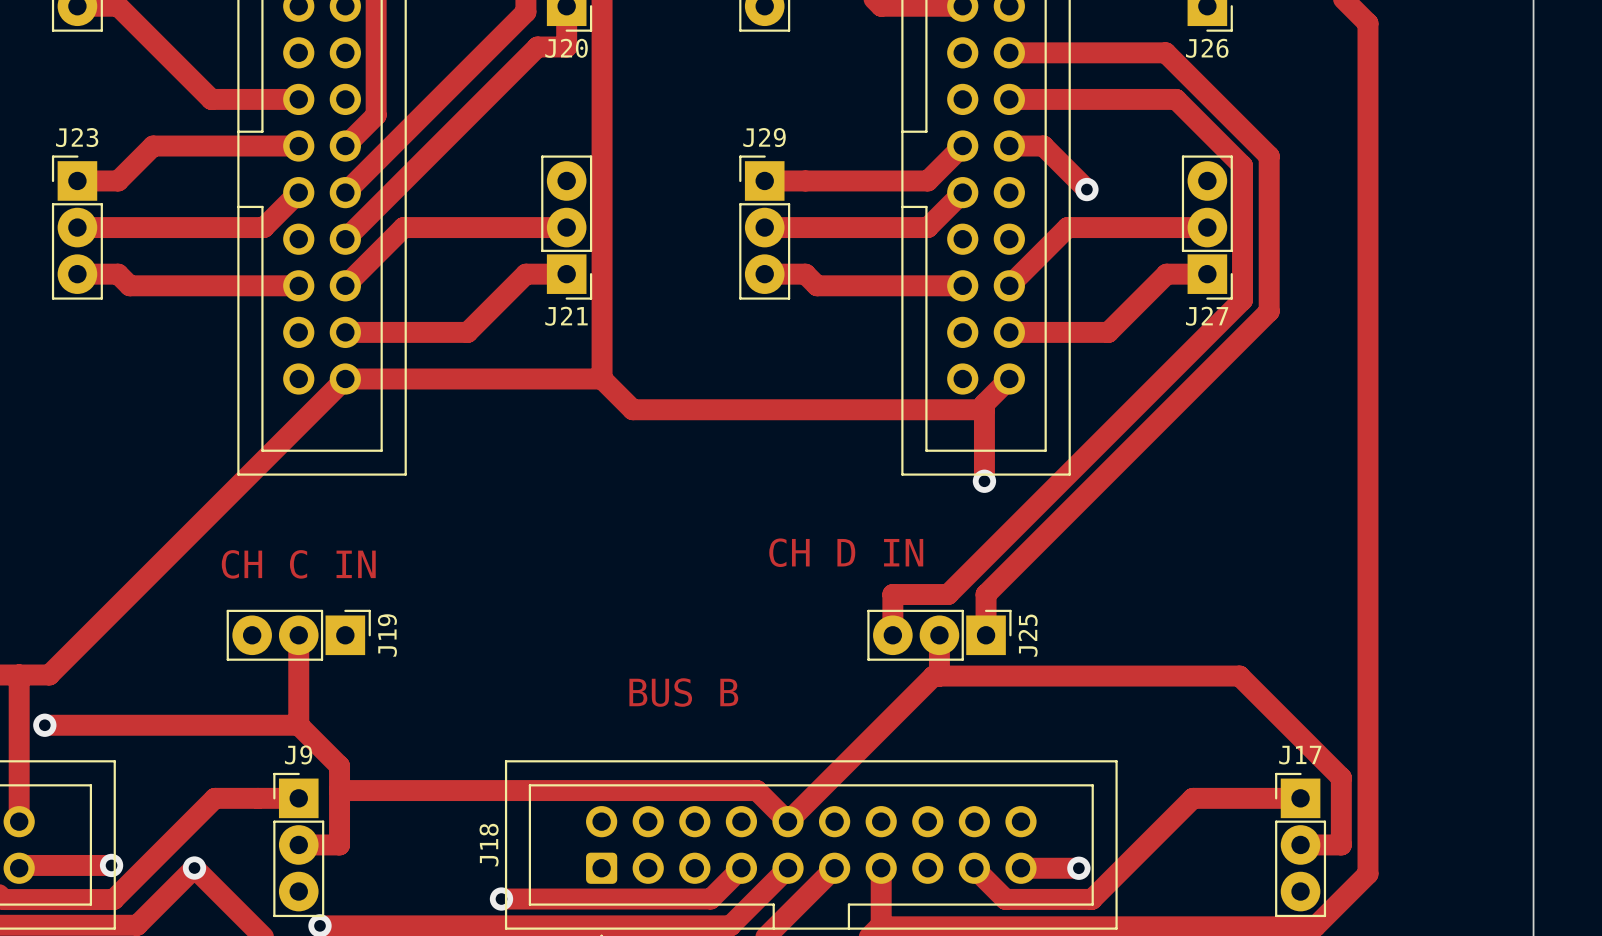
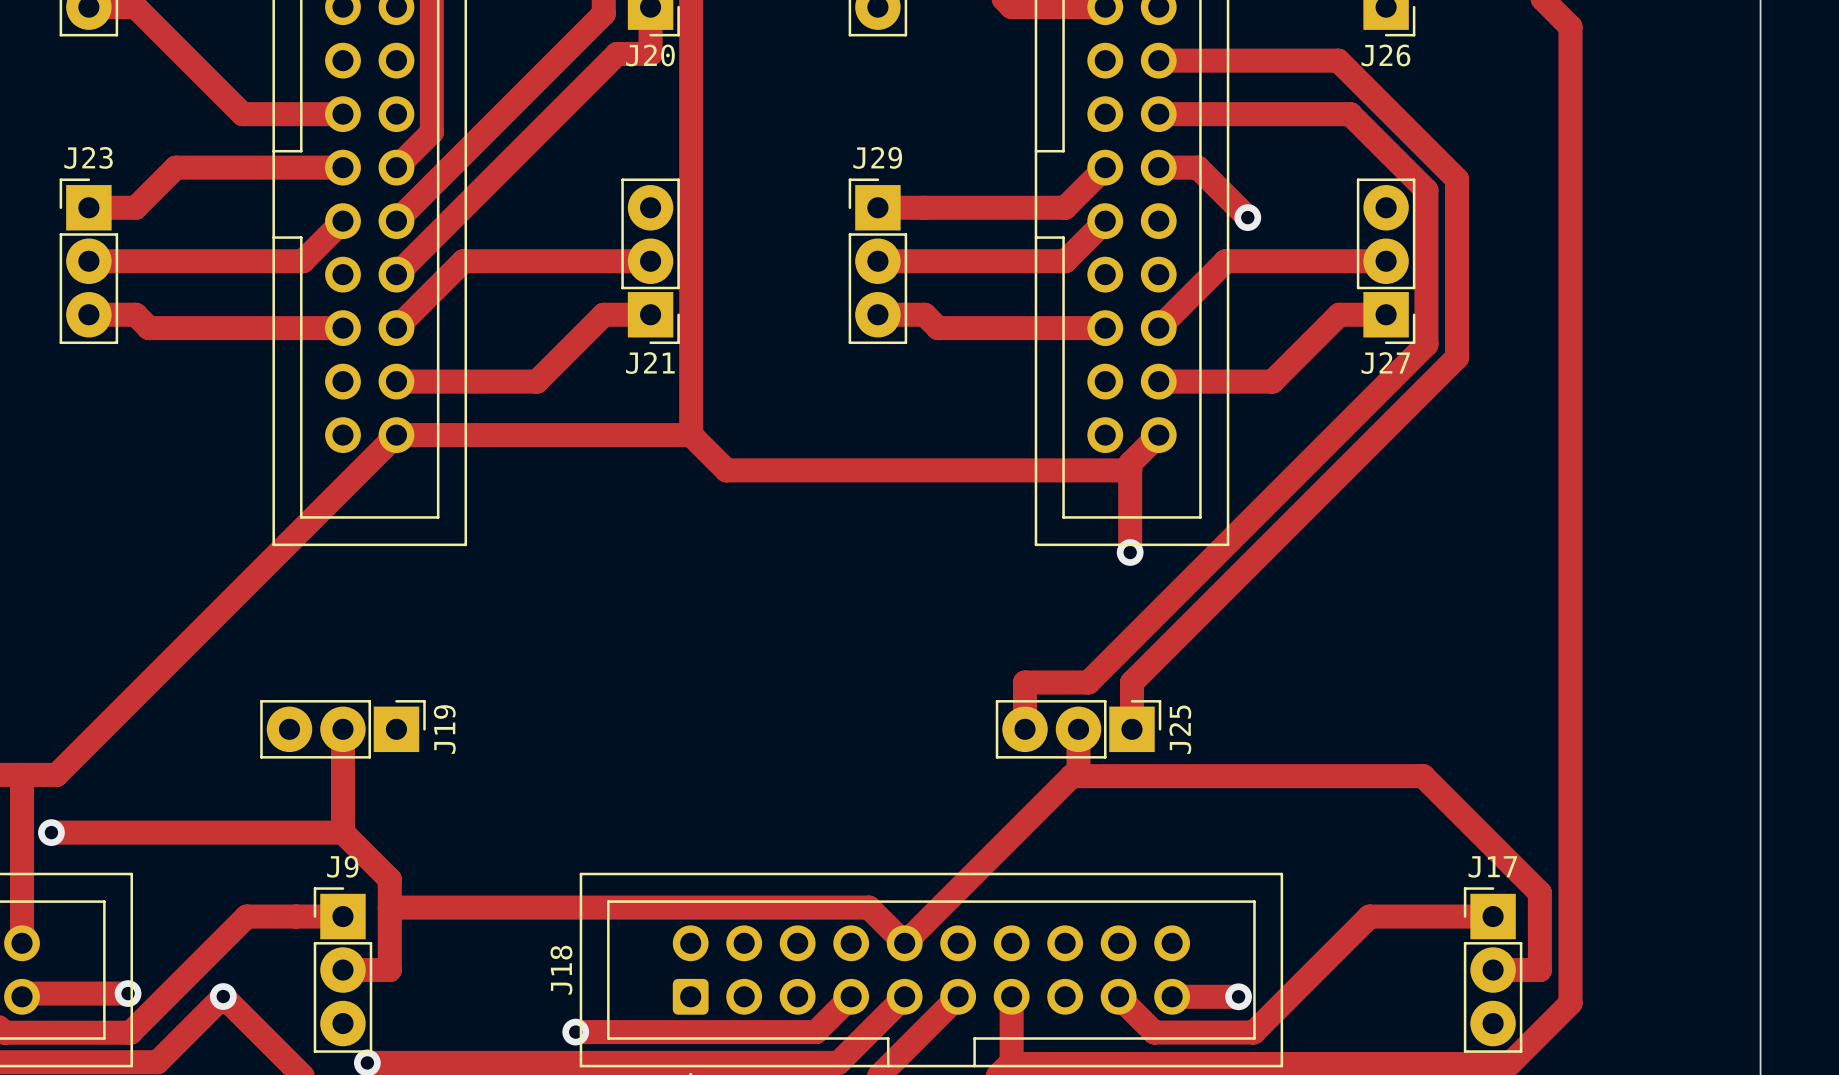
text: CH D IN (846, 552) -> none
text: CH C IN (298, 564) -> none
text: BUS B (683, 692) -> none

